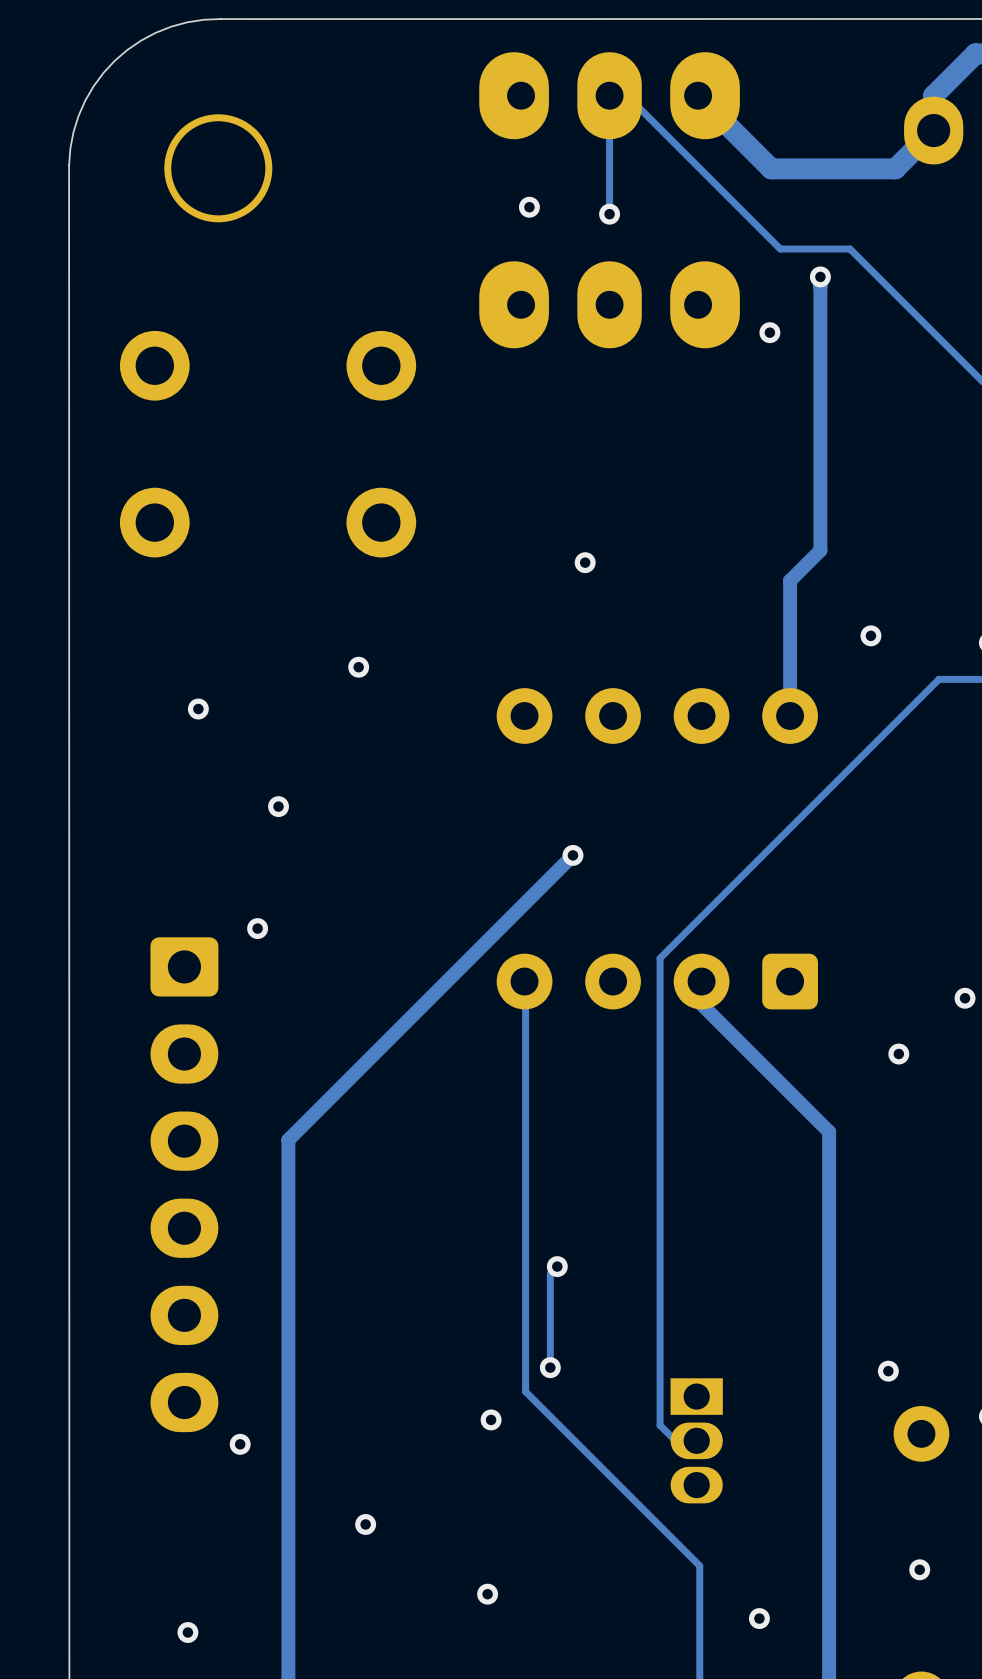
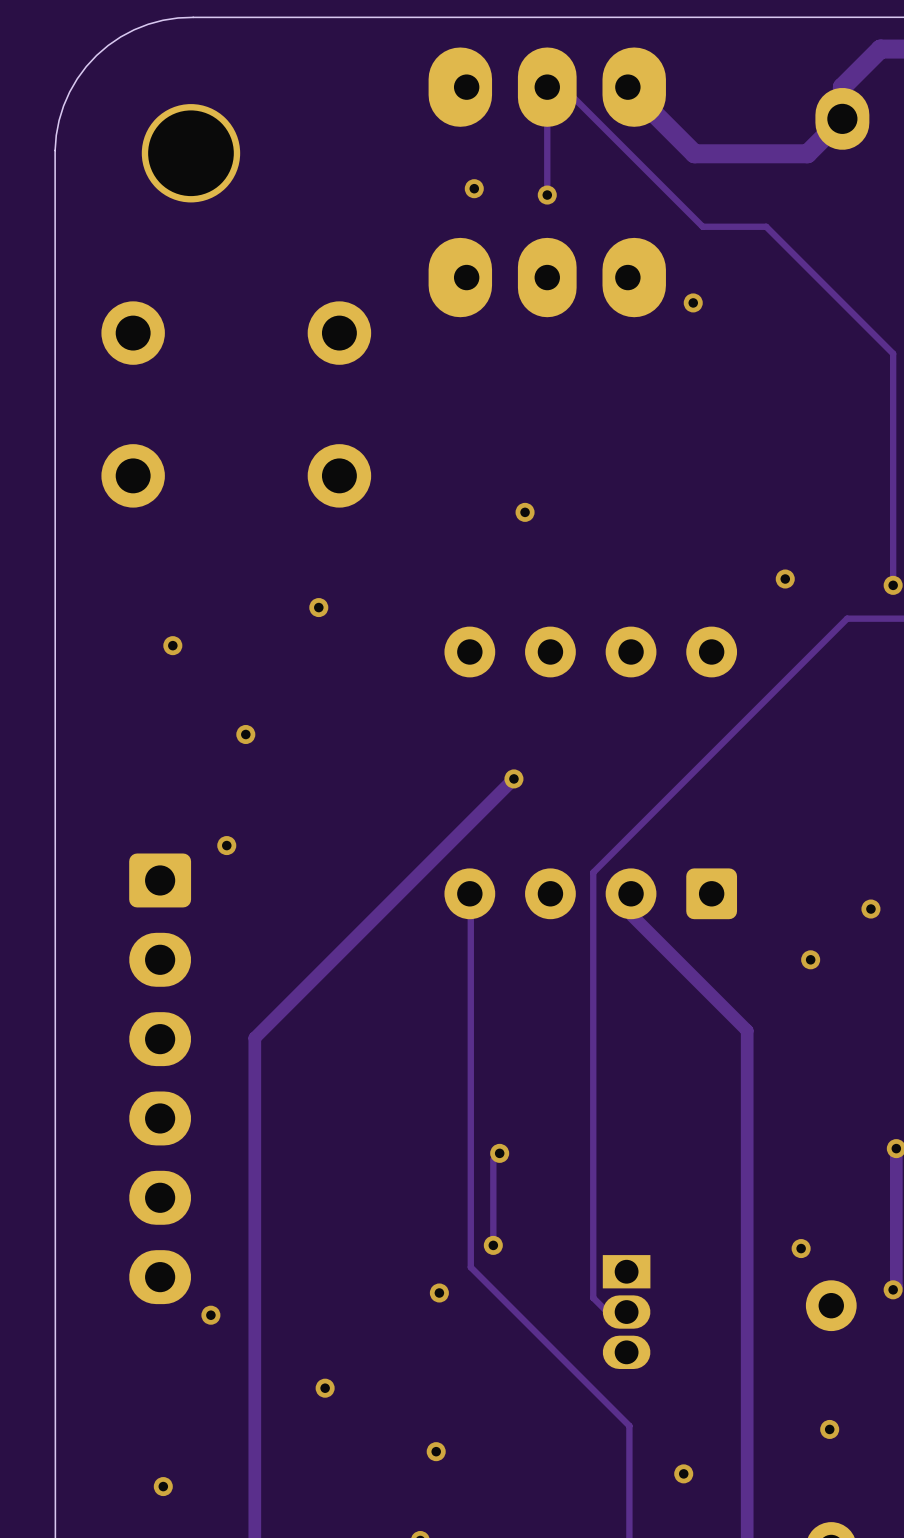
track: (820, 276) (820, 550) (790, 580) (790, 716) -> none
via: (820, 276) -> none

